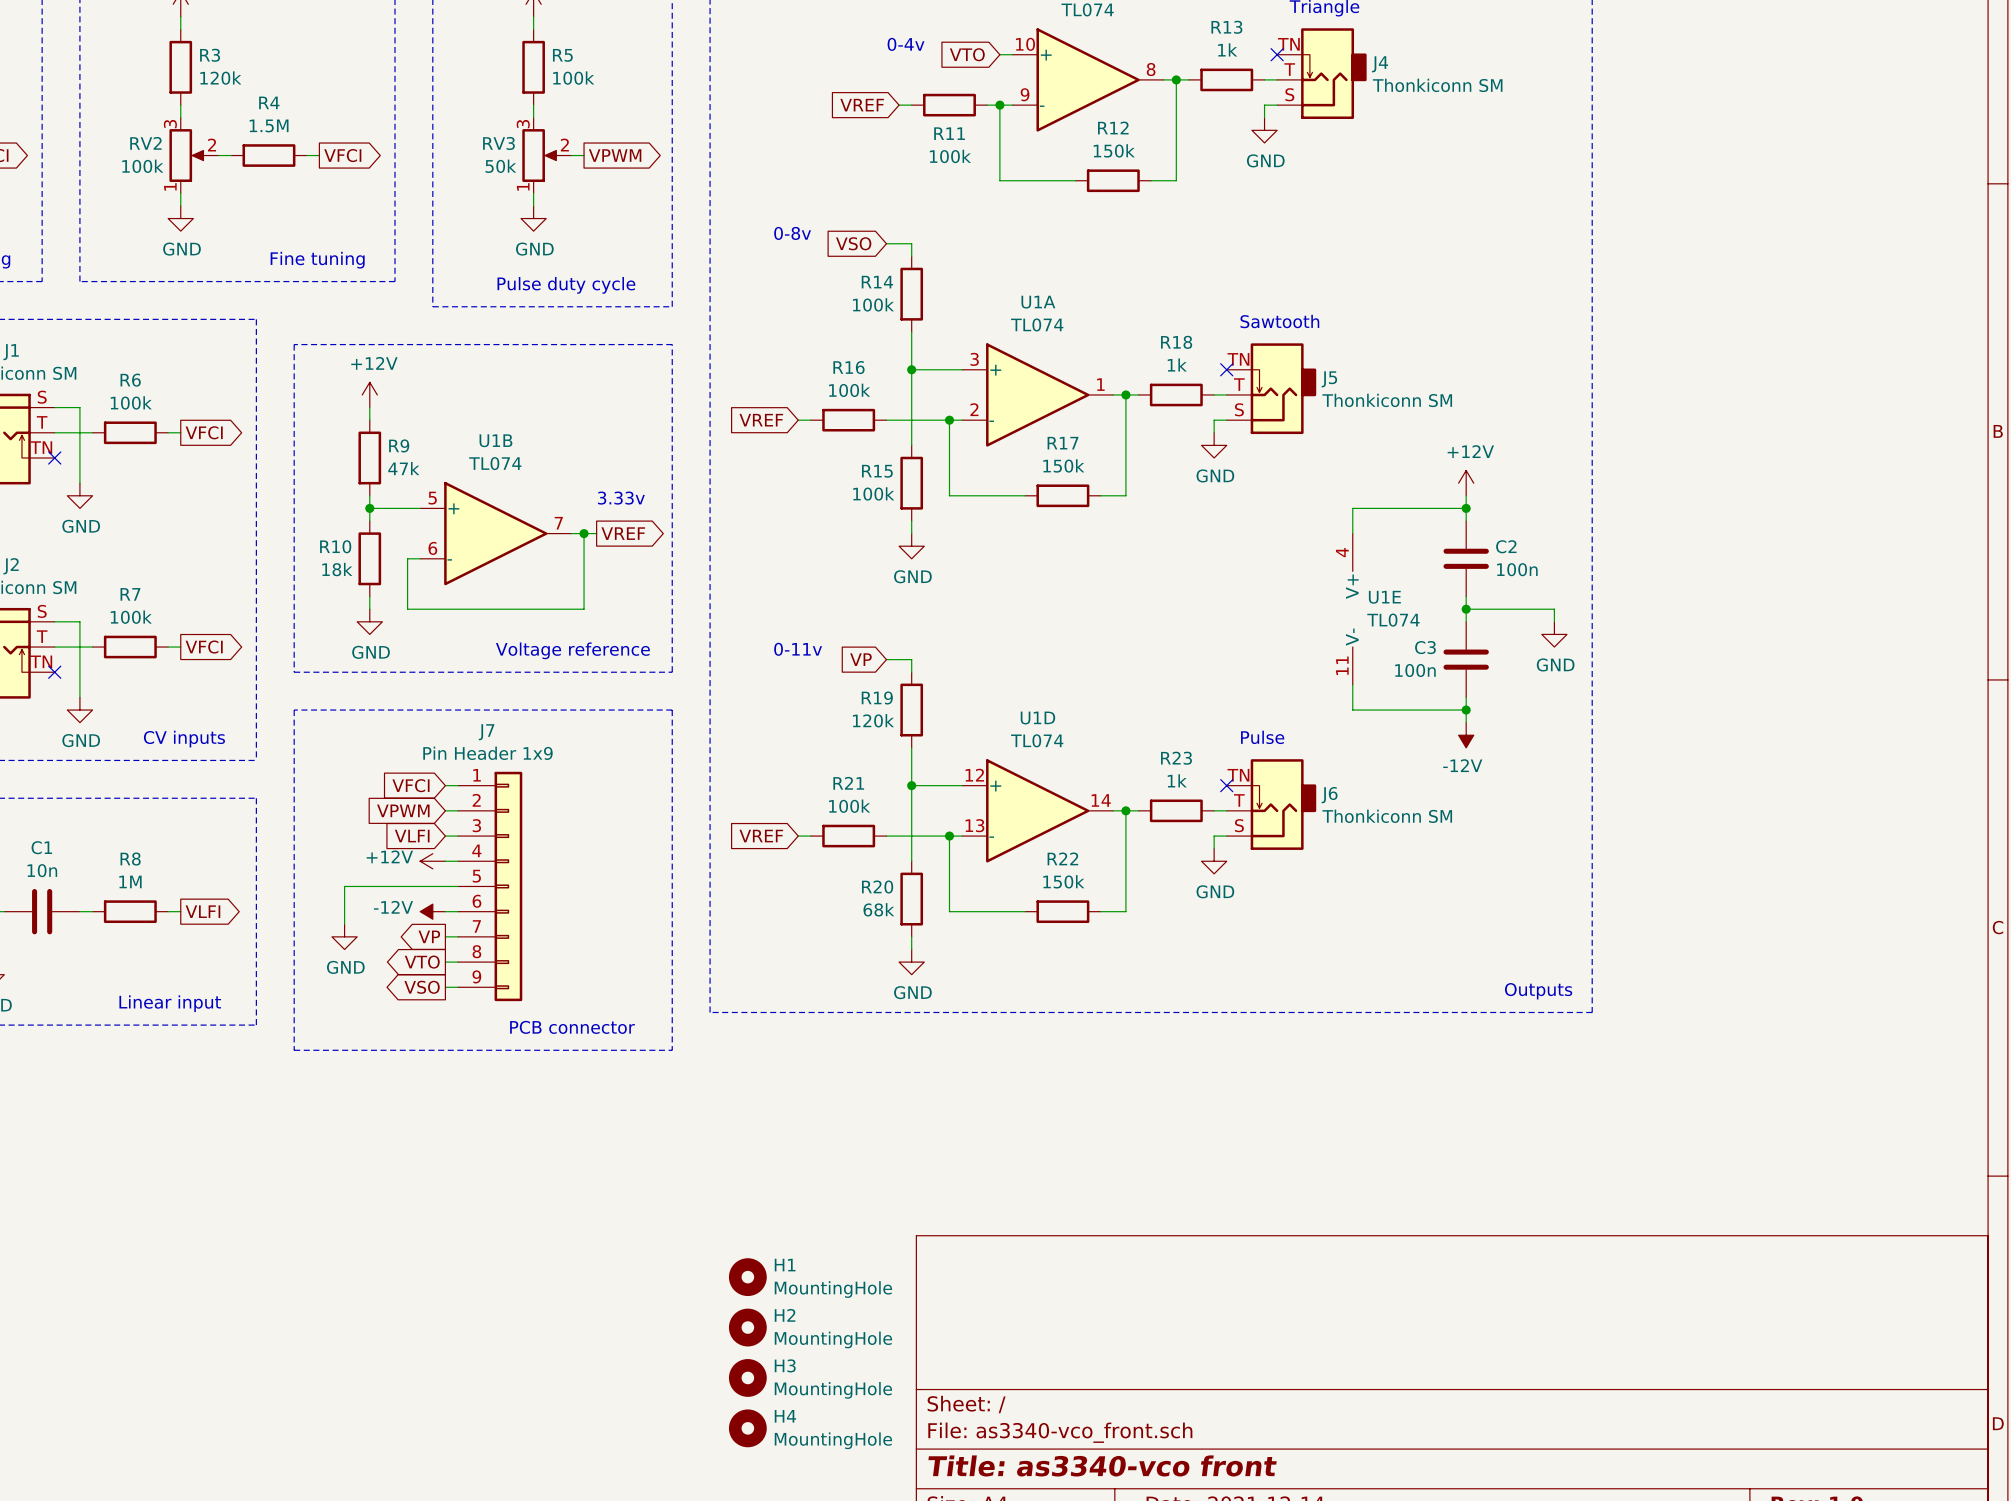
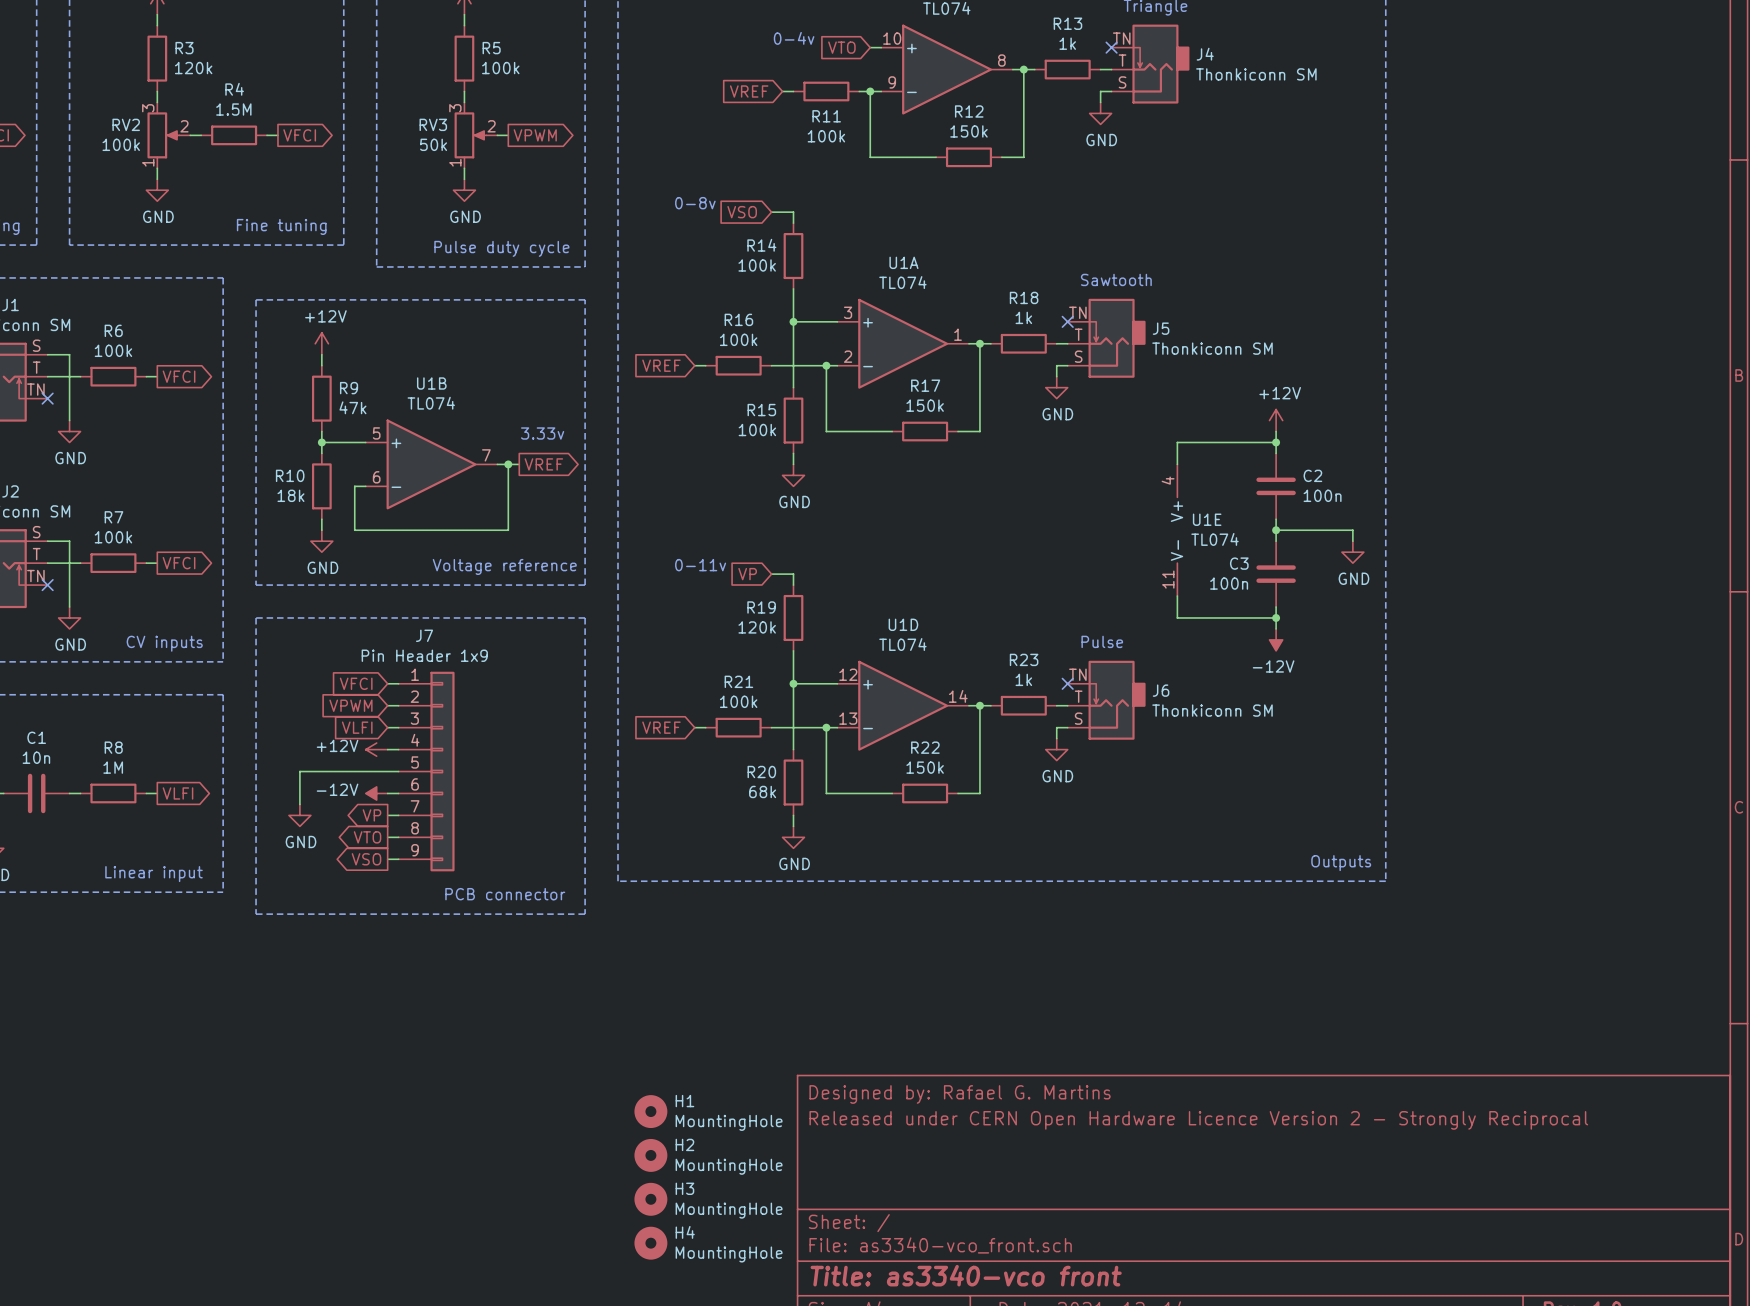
title block: none -> Designed by: Rafael G. Martins (960, 1094)
title block: none -> Released under CERN Open Hardware Licence Version 2 - Strongly Reciprocal (1198, 1120)

